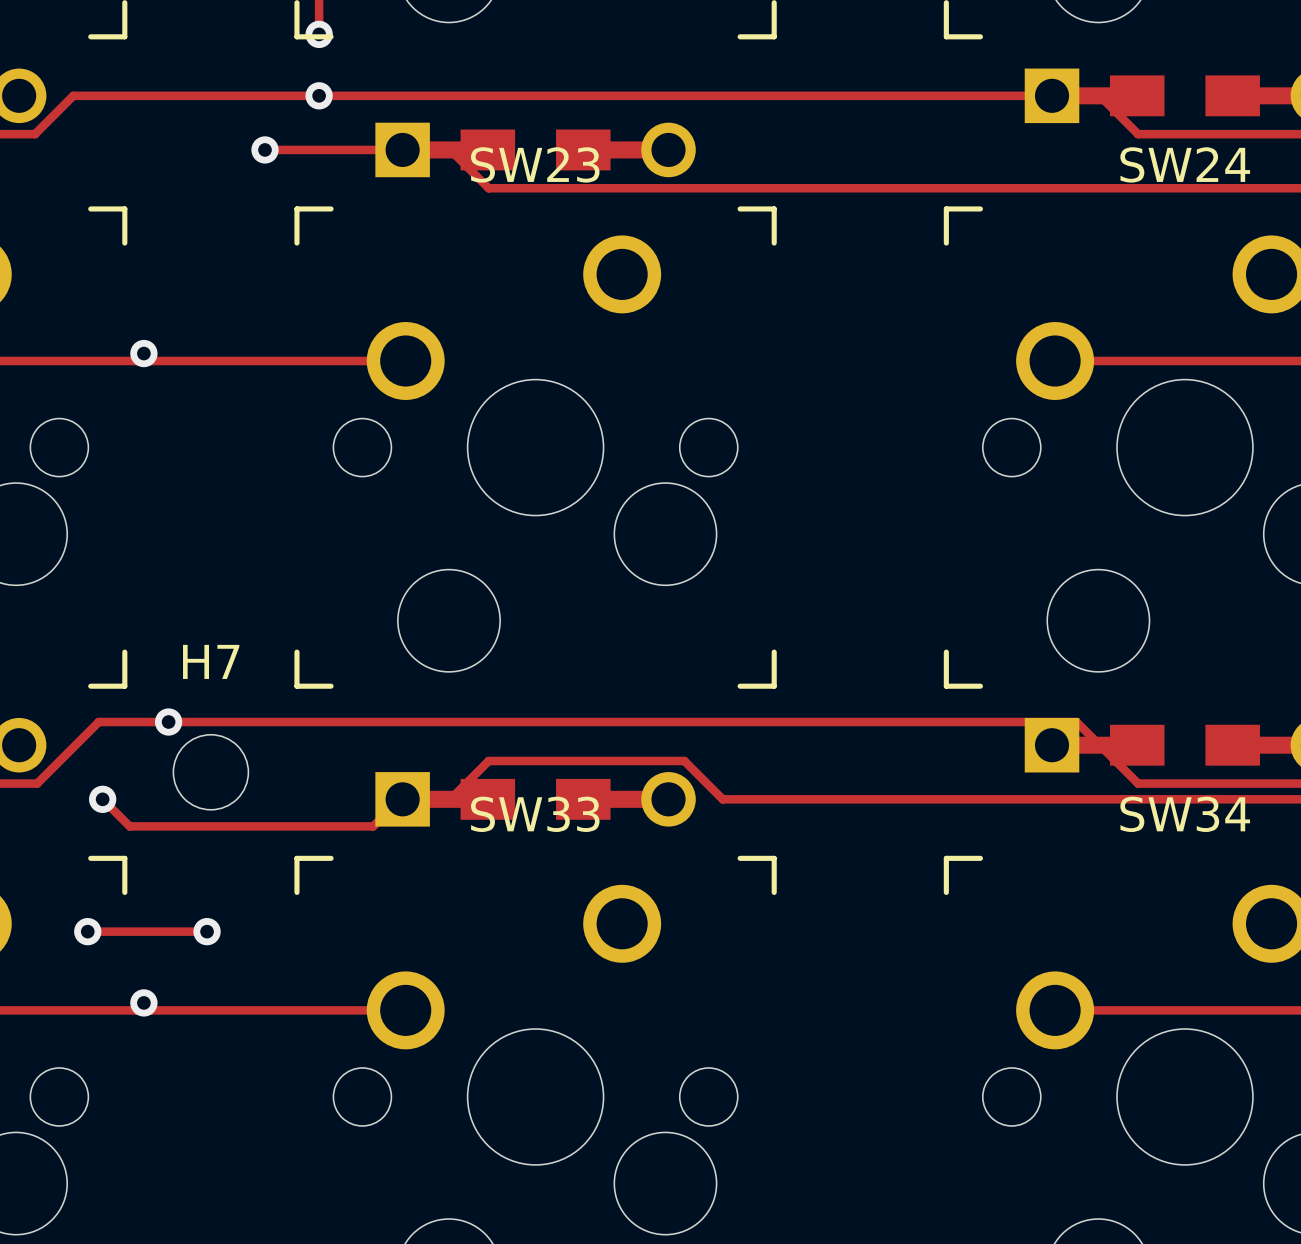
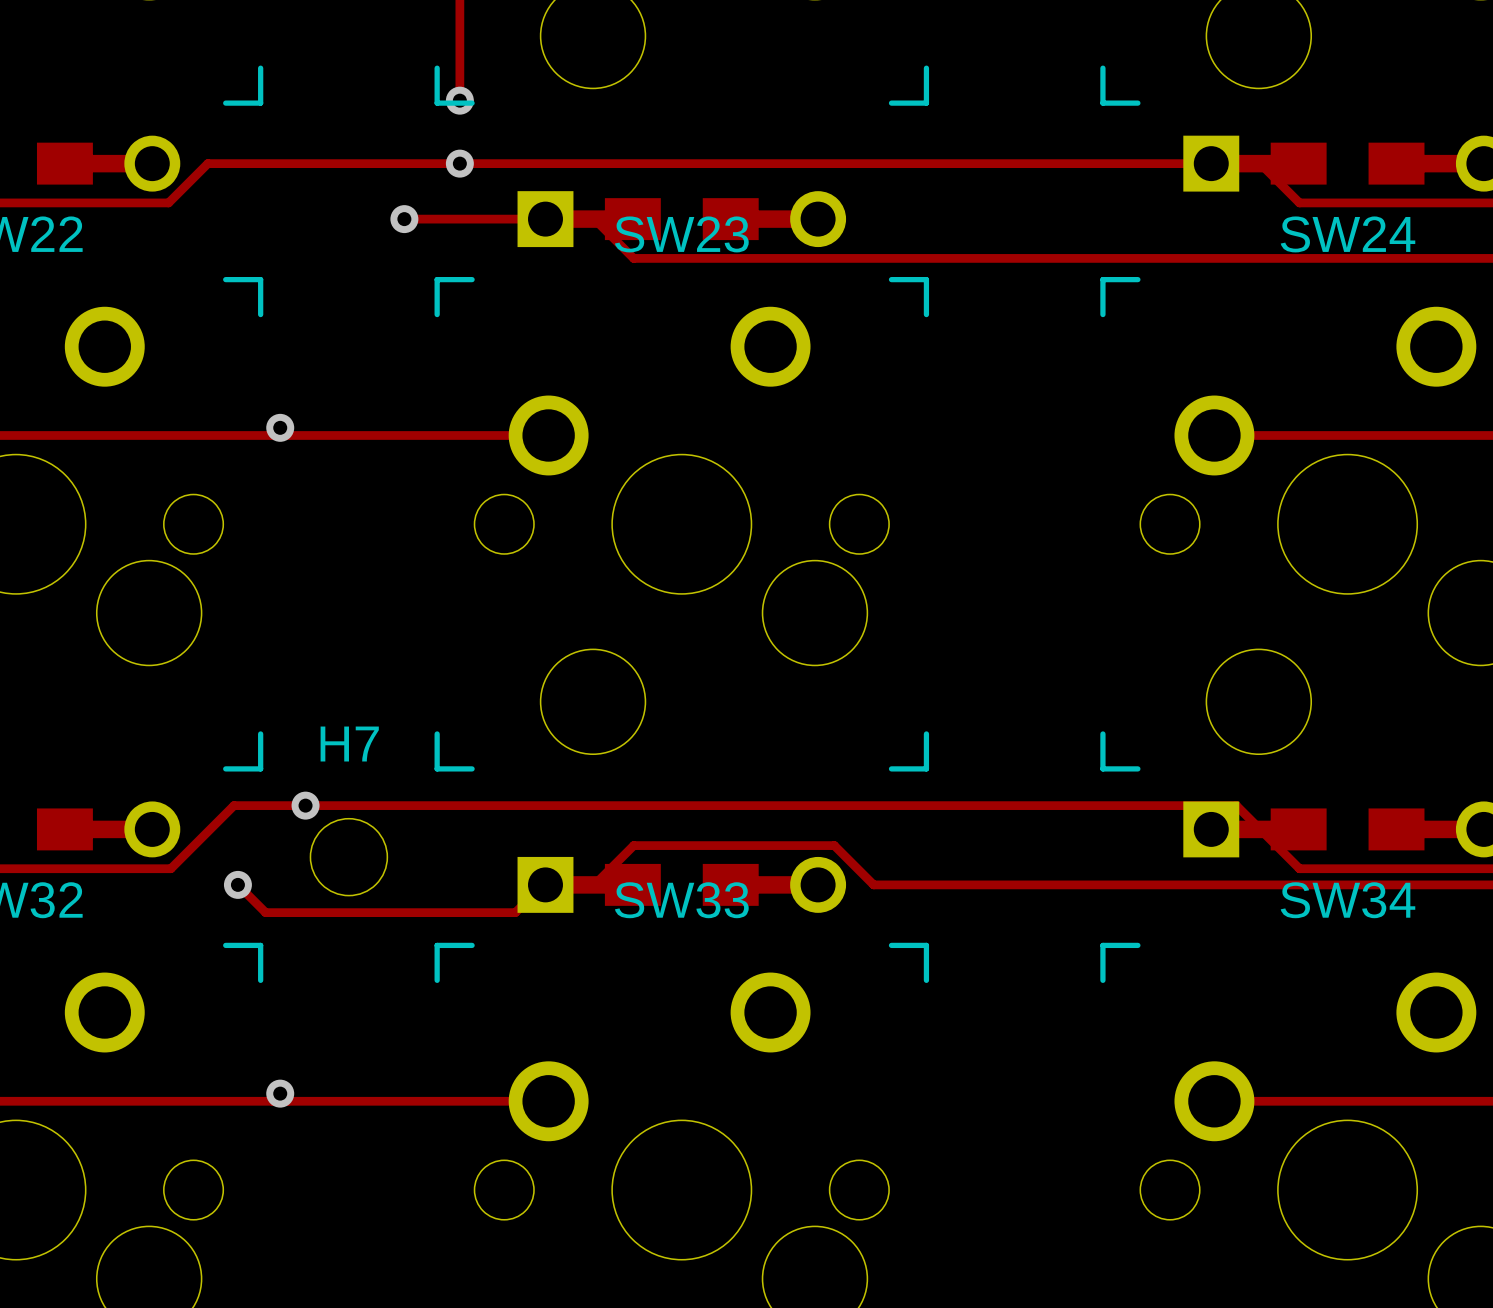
track: (87, 931) (207, 931) -> none
via: (87, 931) -> none
via: (207, 931) -> none

